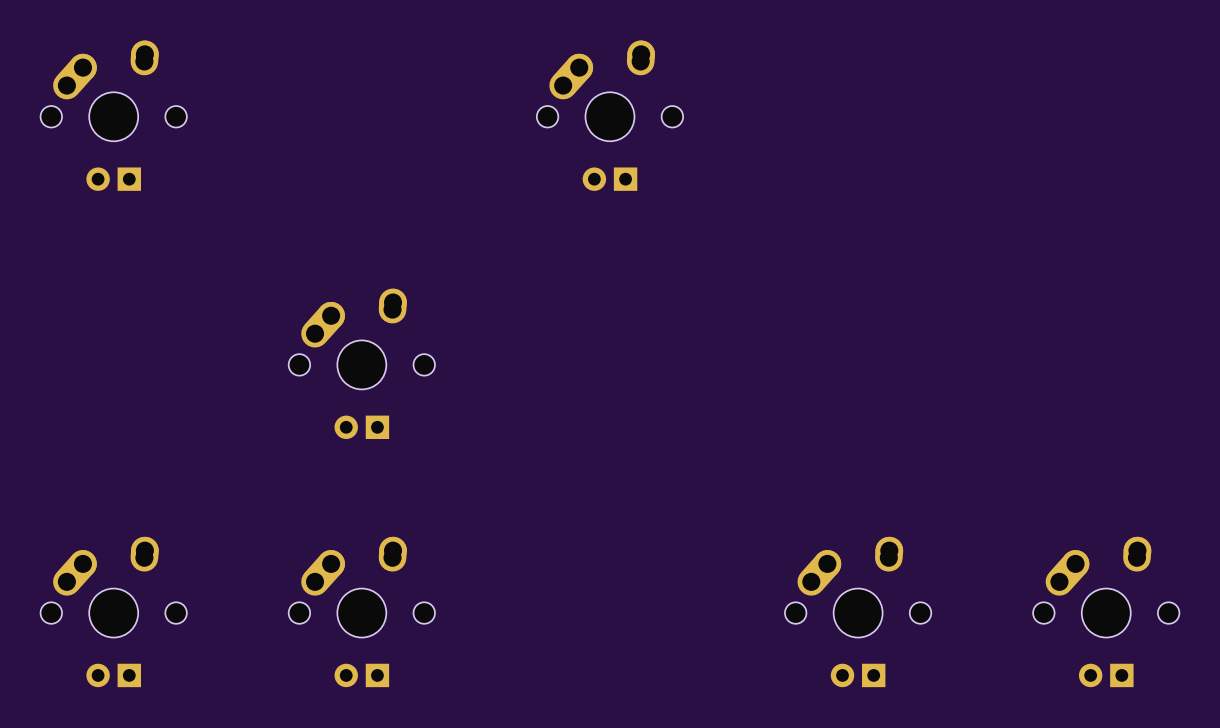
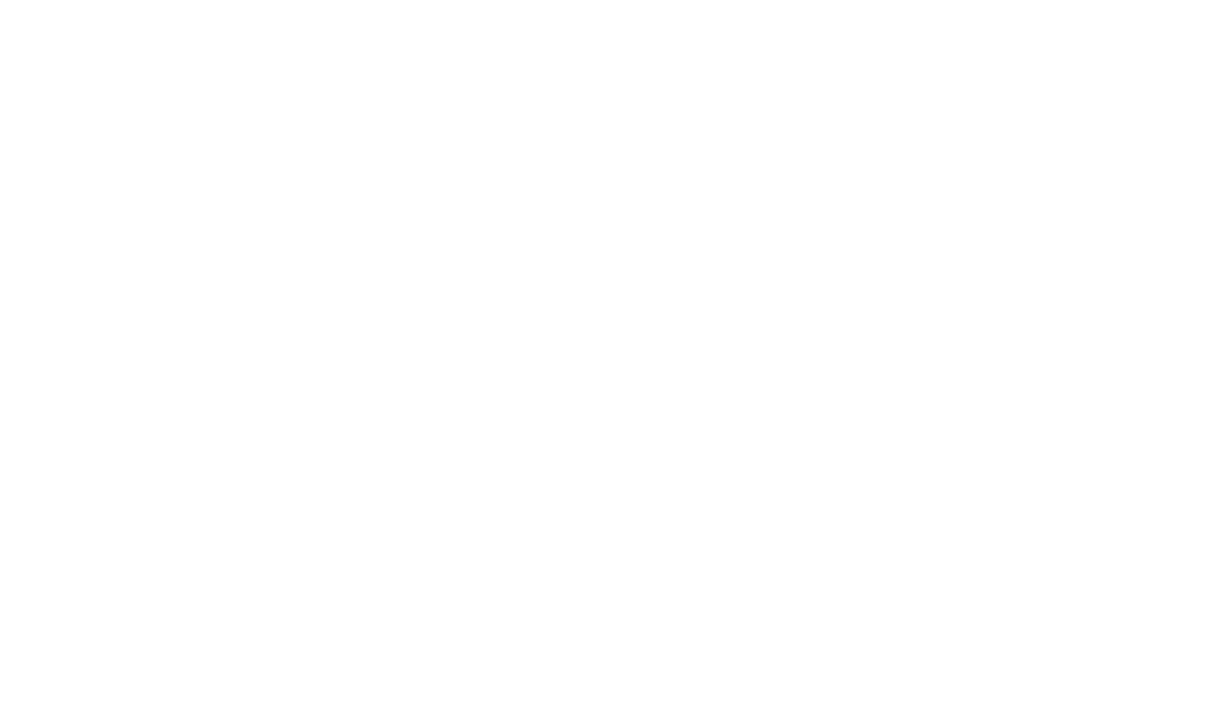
part: (113, 115) -> none
part: (609, 115) -> none
part: (361, 363) -> none
part: (113, 611) -> none
part: (361, 611) -> none
part: (858, 611) -> none
part: (1106, 611) -> none

